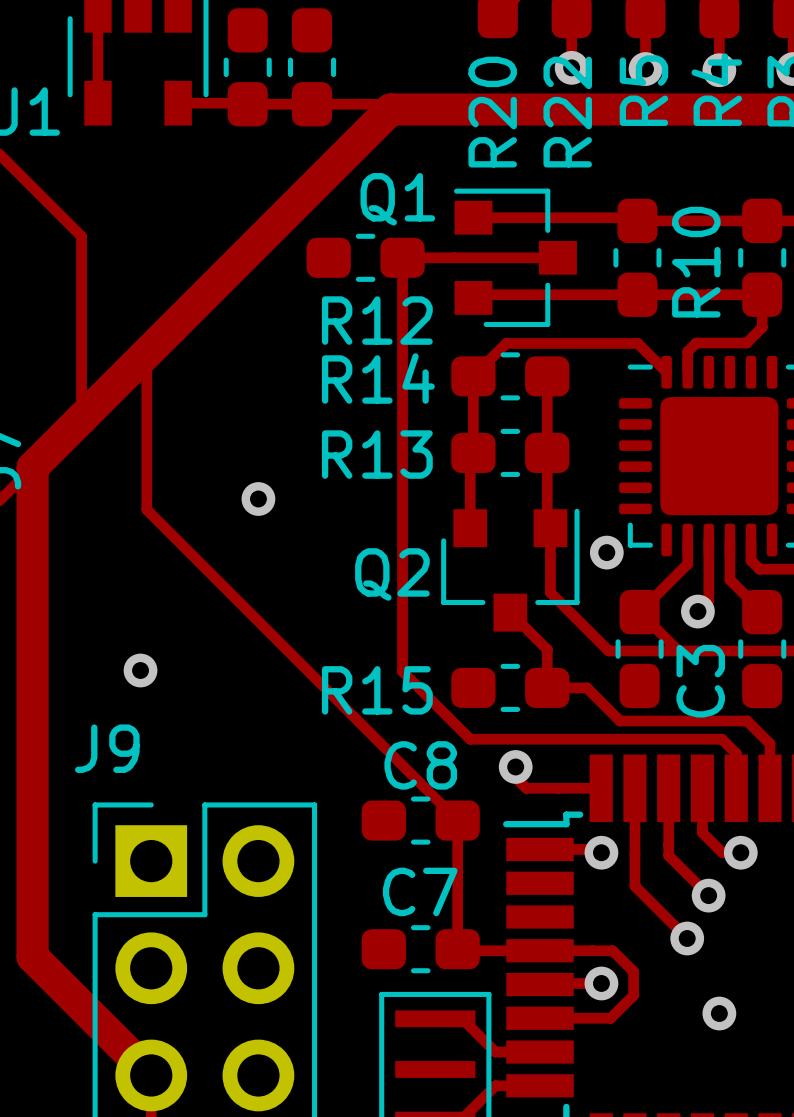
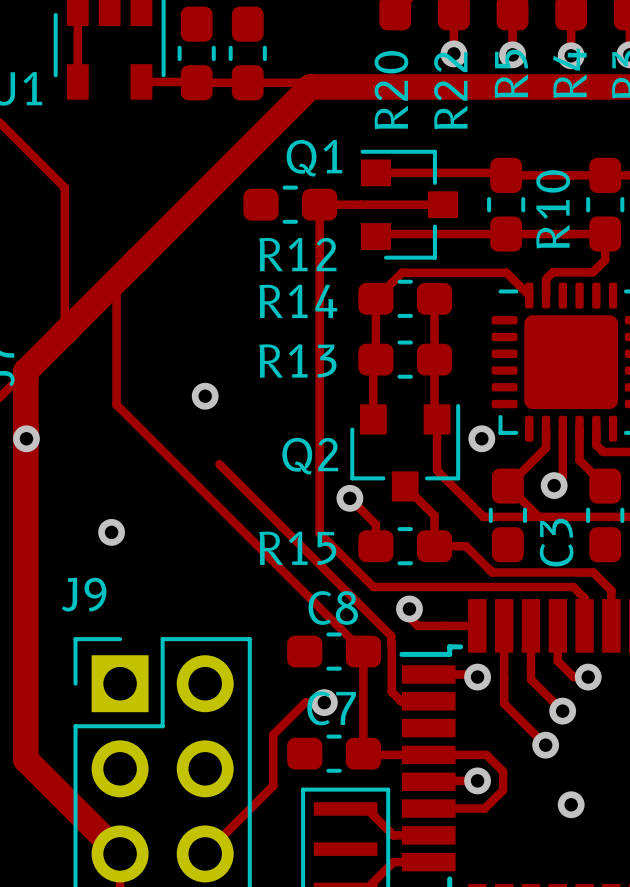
via: none -> (26, 438)
track: none -> (219, 464) (391, 636) (391, 691) (401, 701) (428, 701)
track: none -> (349, 498) (375, 524) (375, 546)
via: none -> (349, 498)
track: none -> (324, 702) (305, 702) (273, 734) (273, 785) (205, 853)
via: none -> (324, 702)

